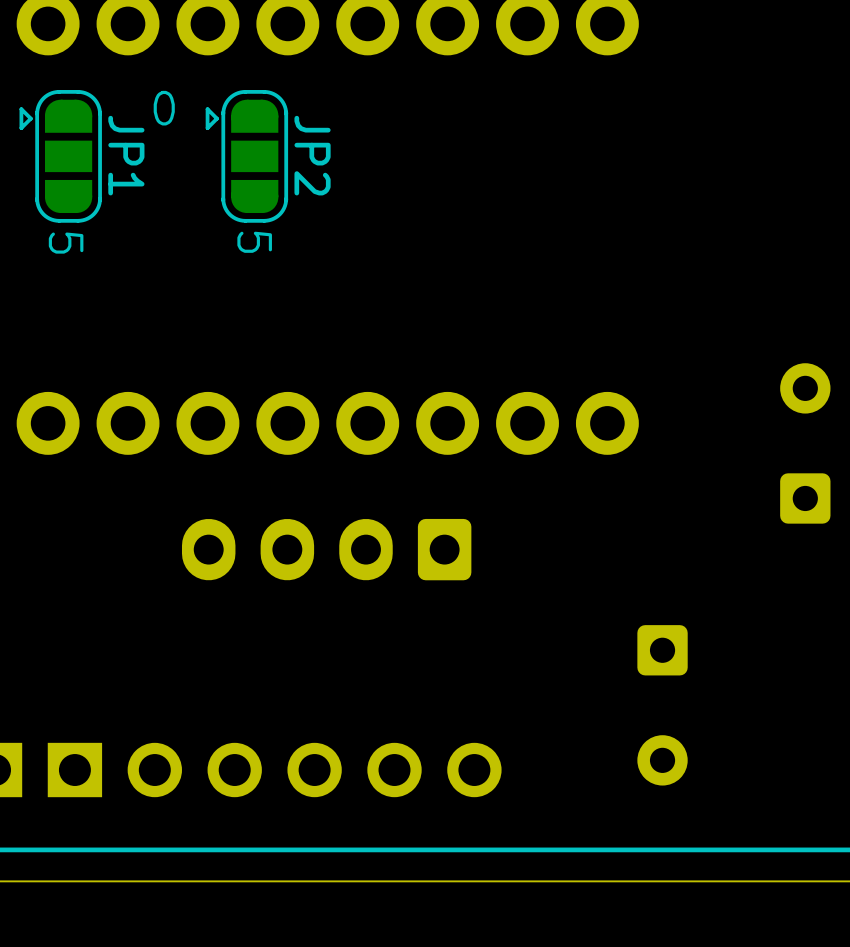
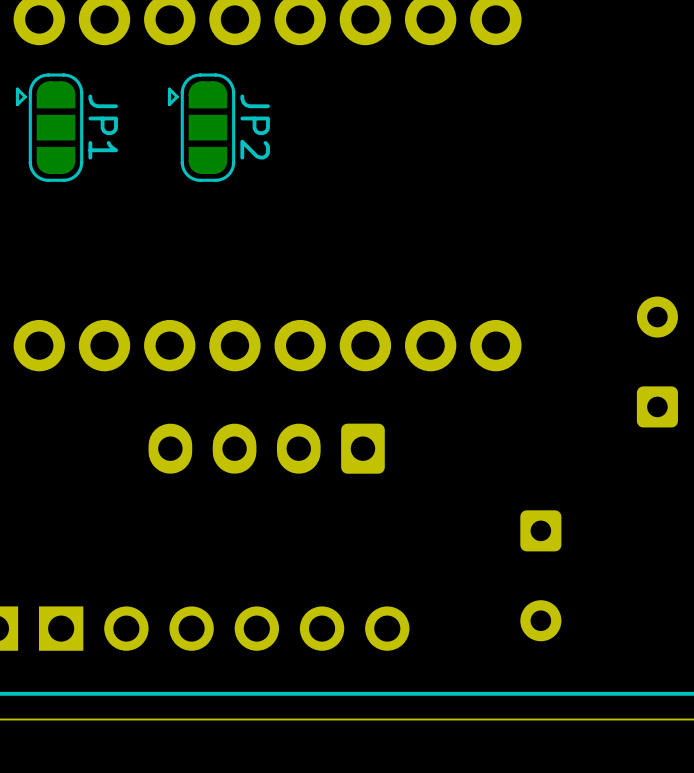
text: 0 (164, 108) -> none
text: 5 (254, 242) -> none
text: 5 (66, 243) -> none

